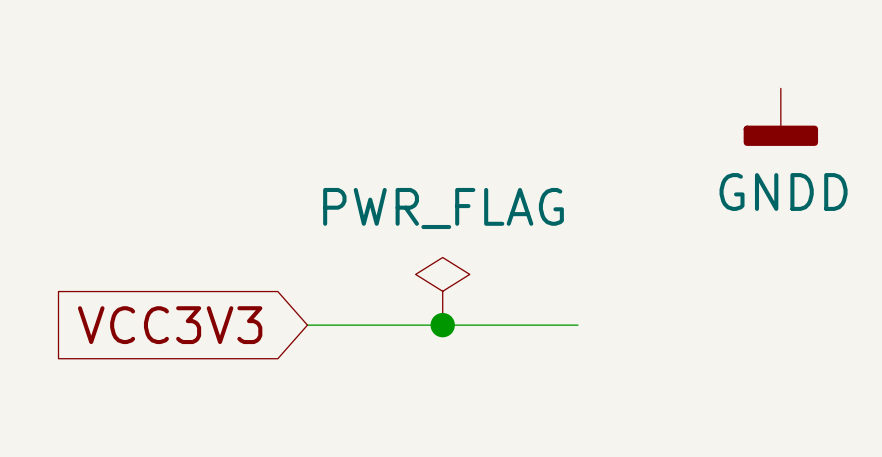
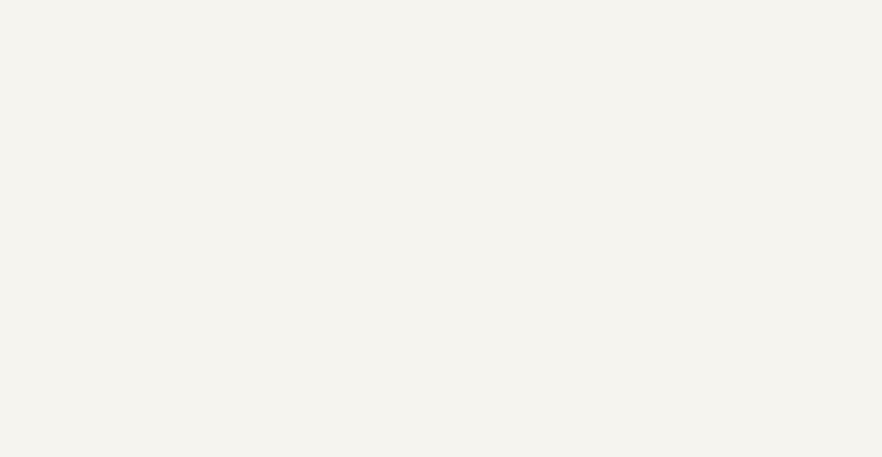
power symbol: GNDD (780, 117) -> none
power symbol: PWR_FLAG (442, 291) -> none
global label: VCC3V3 (170, 325) -> none
wire: (307, 325) (577, 325) -> none
junction: (442, 325) -> none

